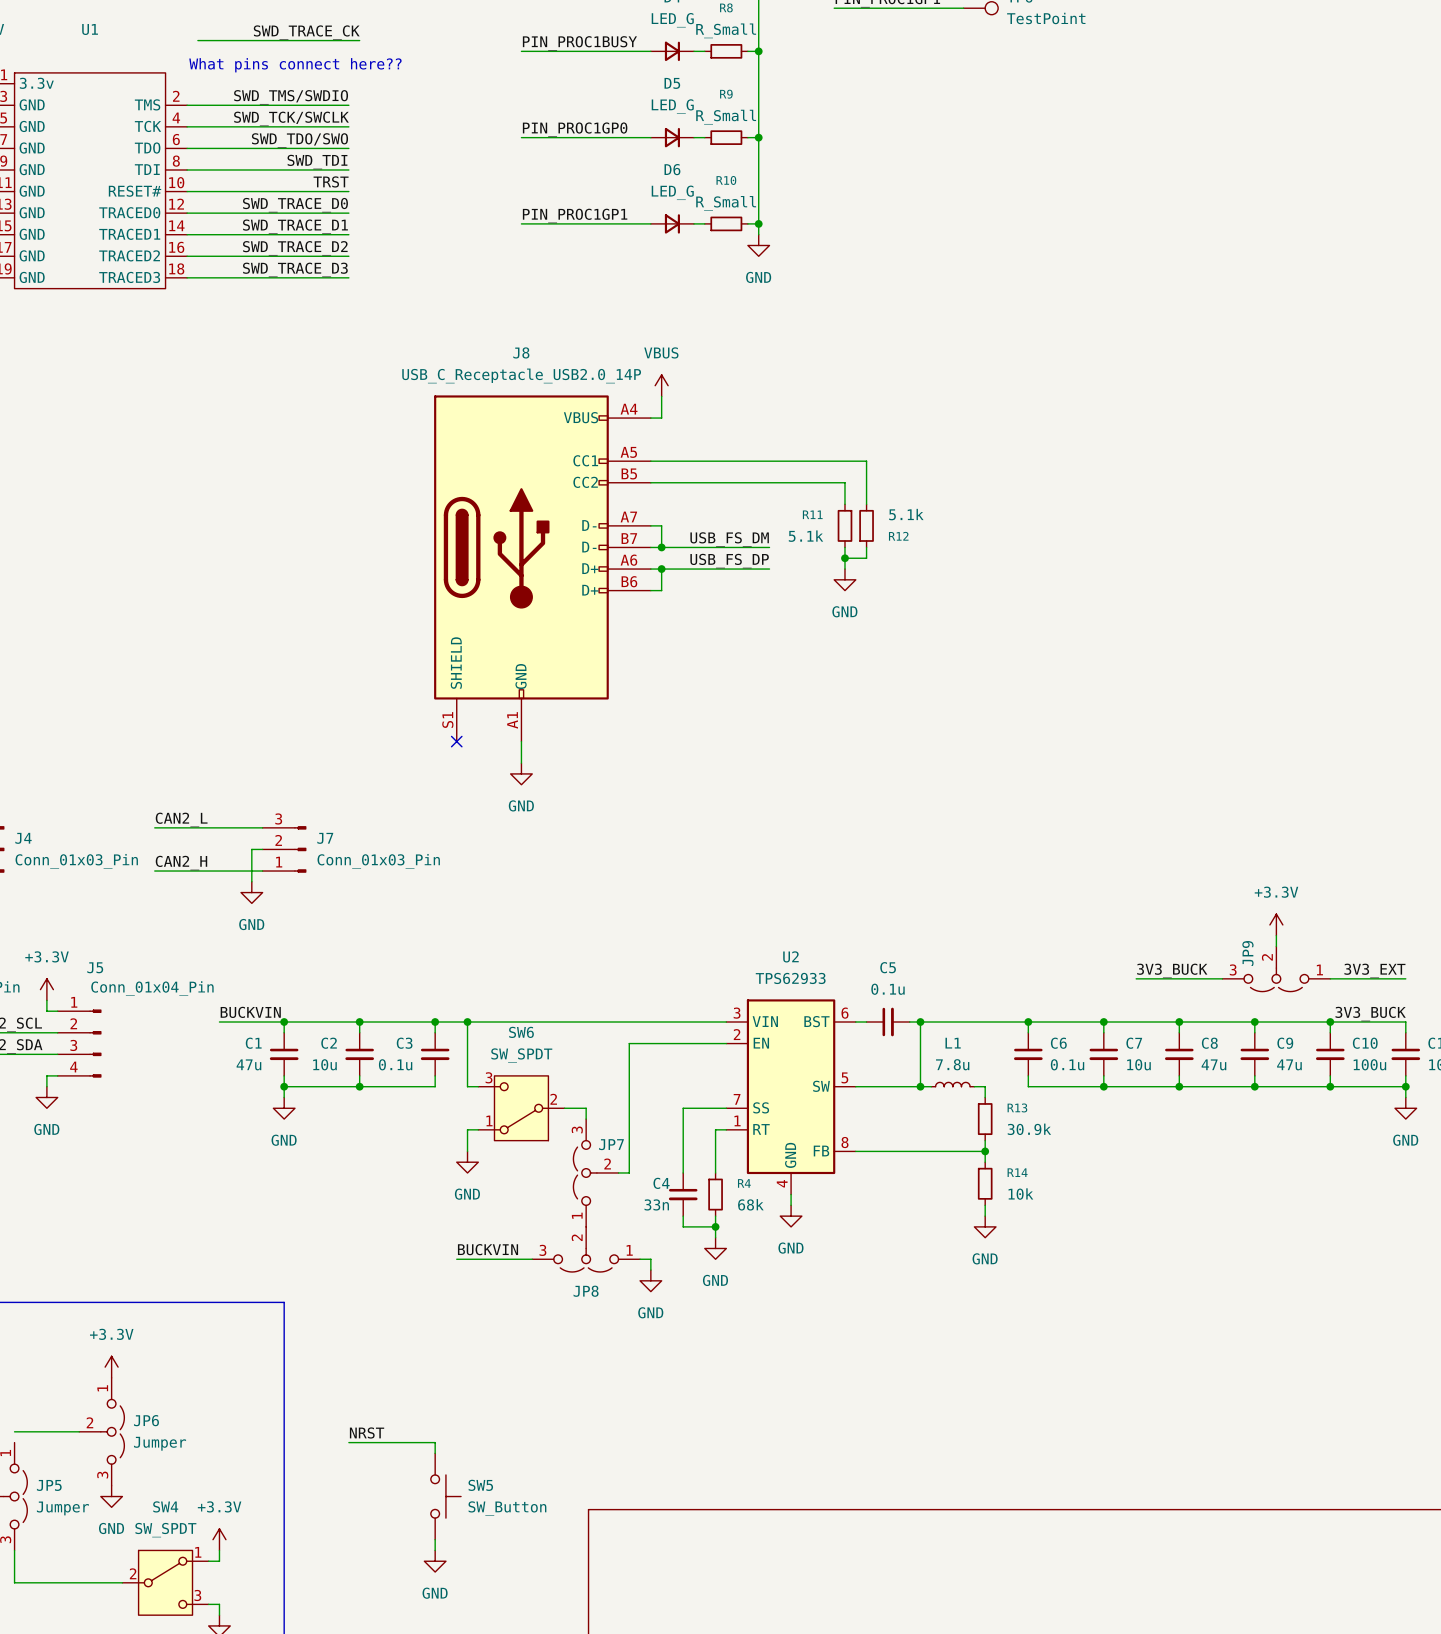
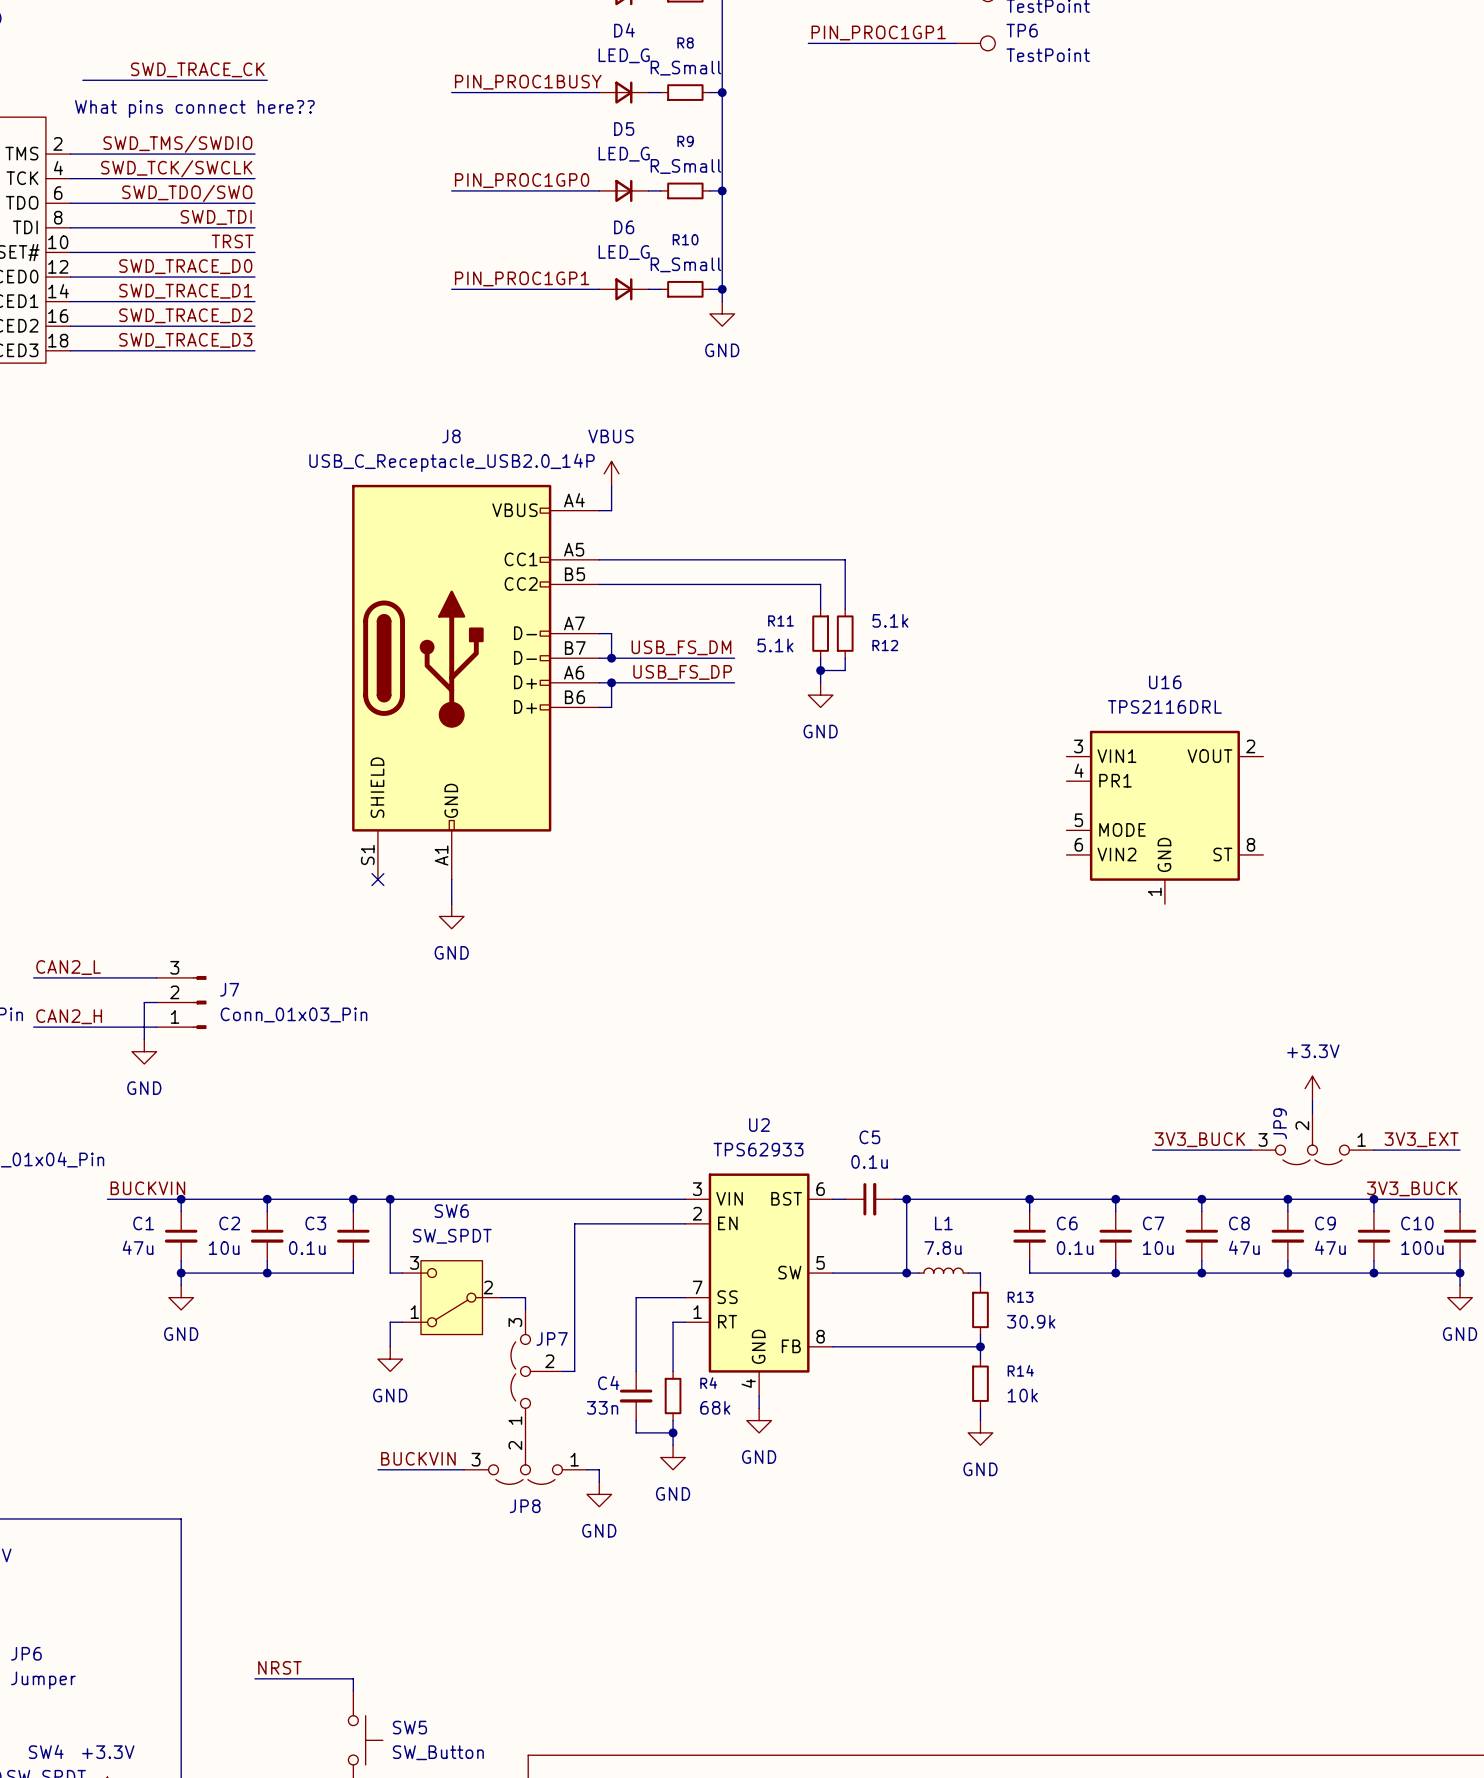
U16: none -> TPS2116DRL (1164, 817)

